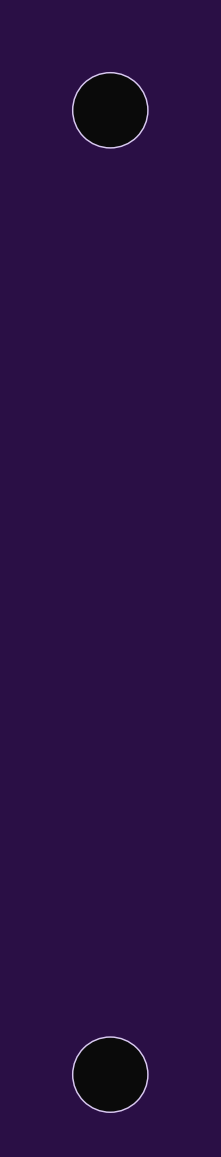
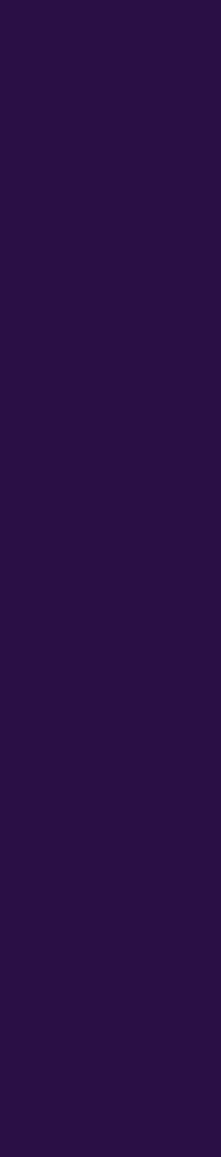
part: (110, 110) -> none
part: (110, 1074) -> none

